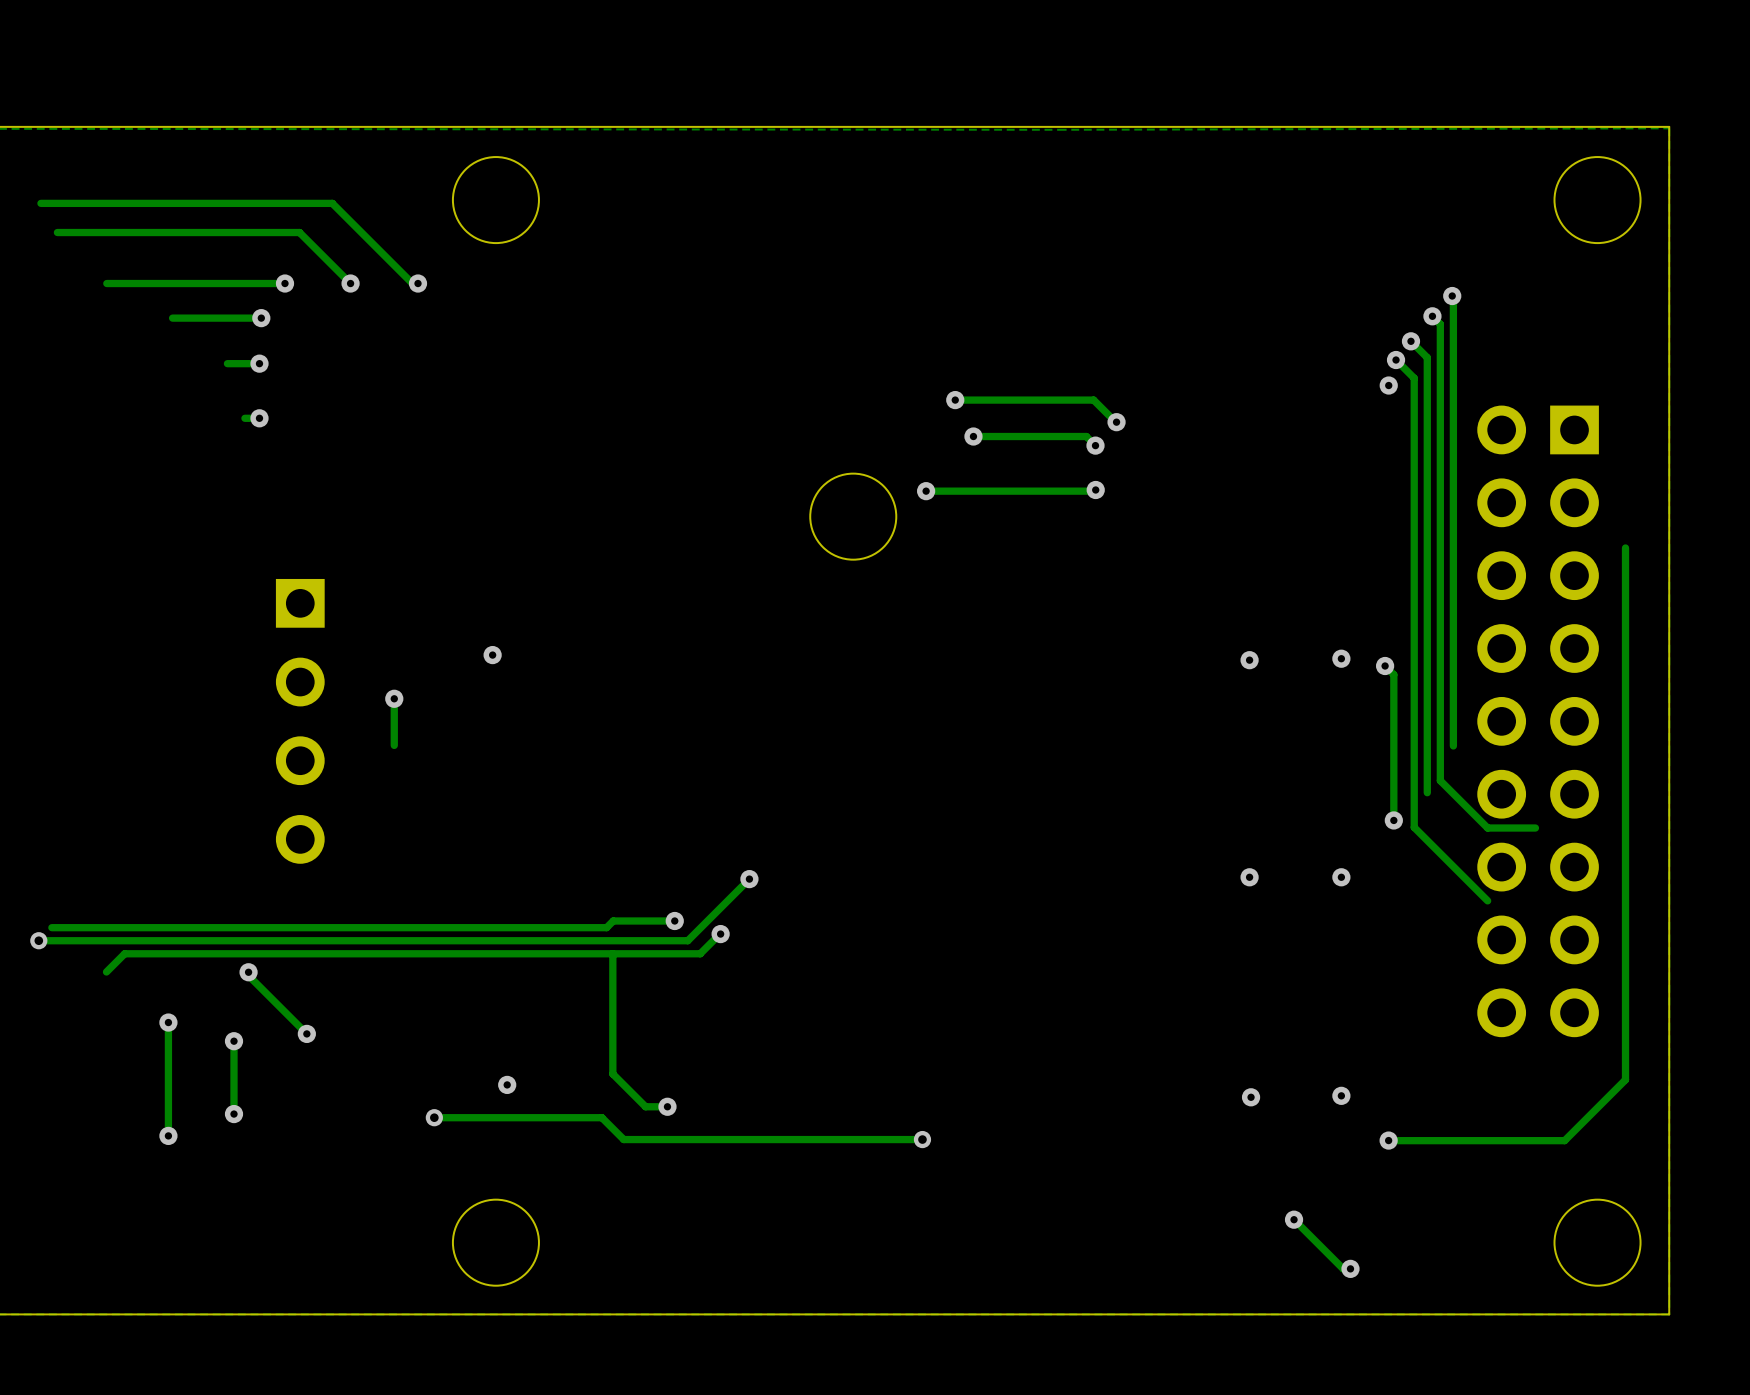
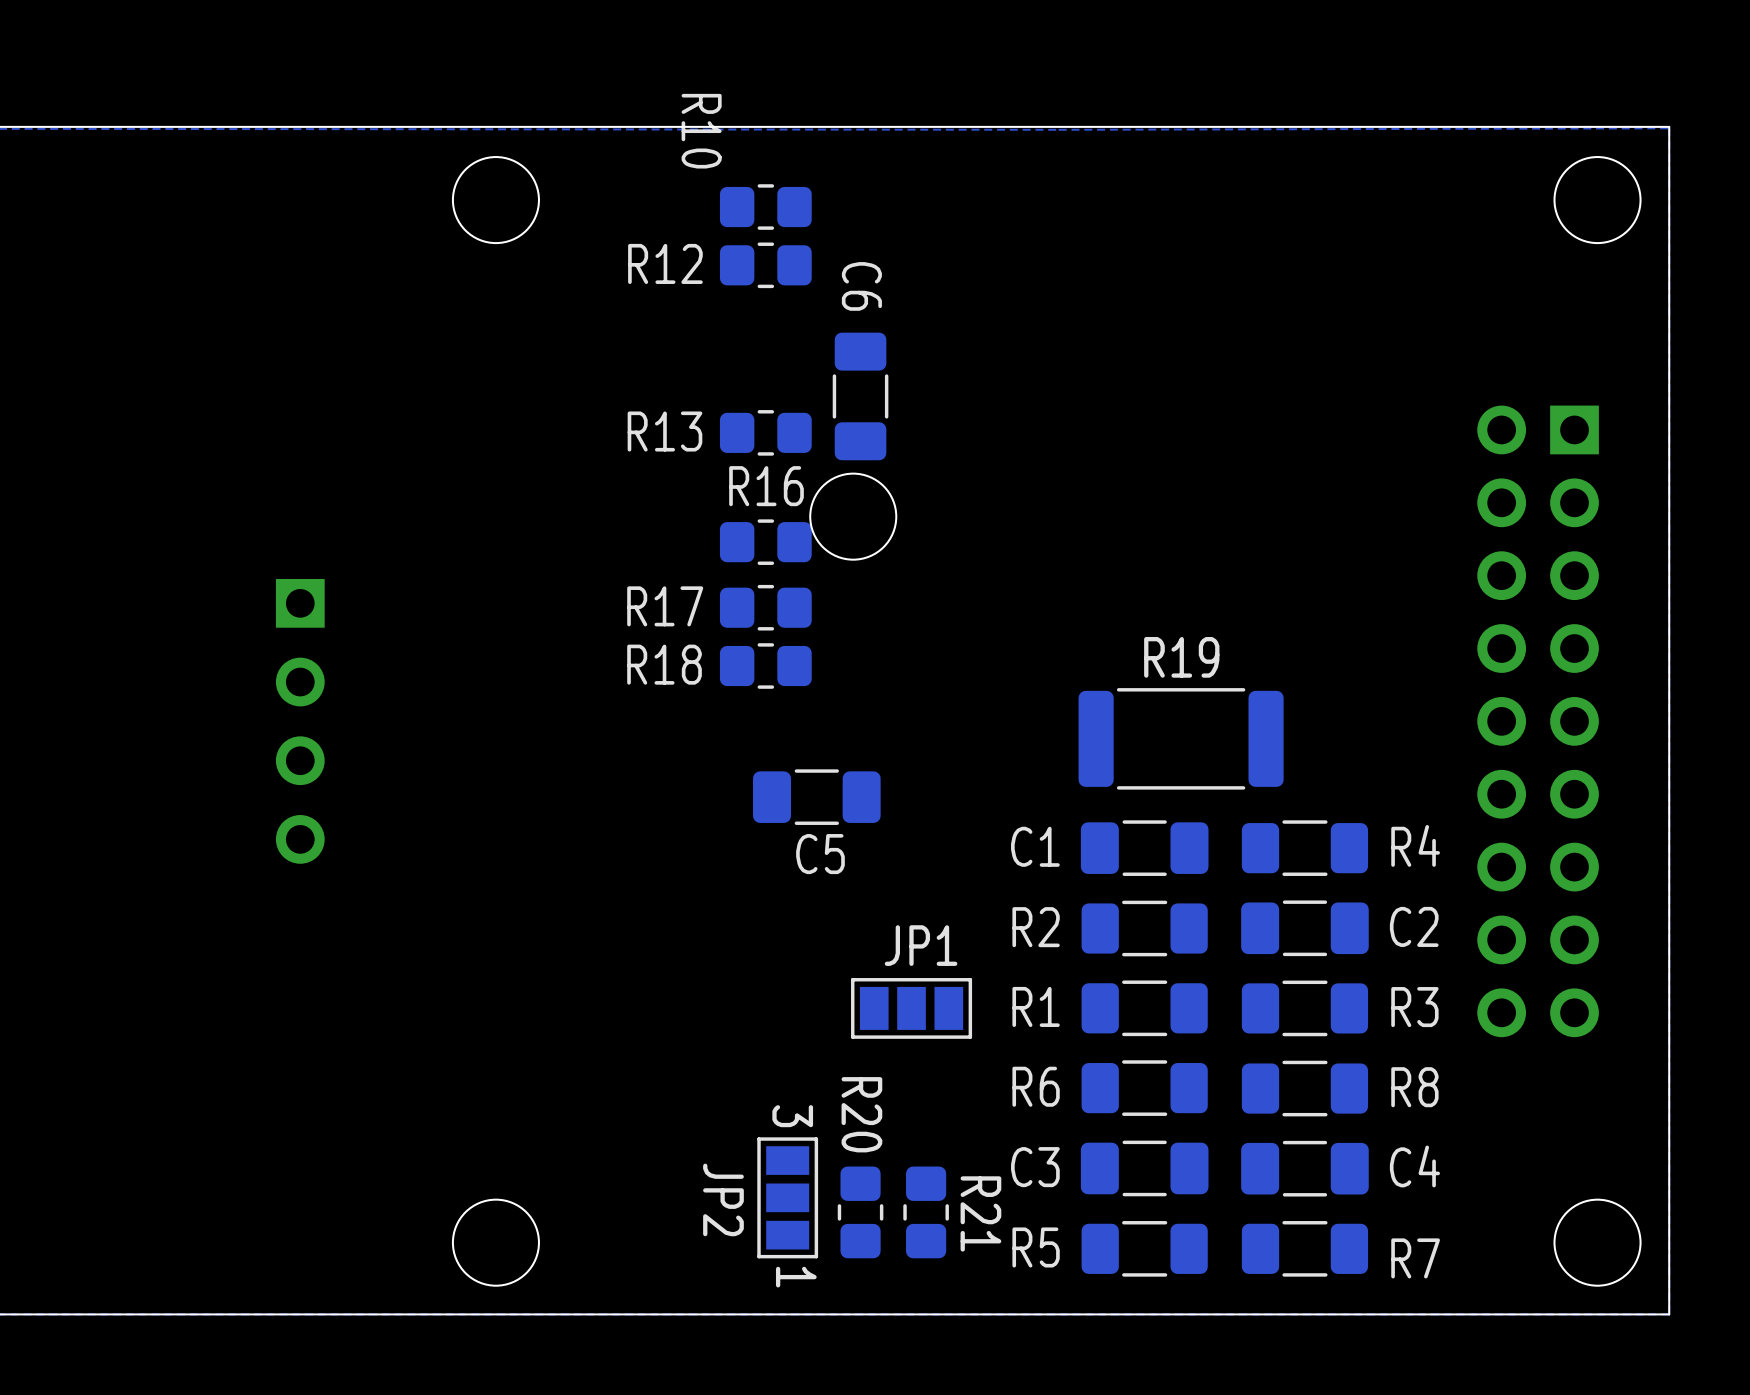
track: (40, 203) (332, 203) (412, 283) (418, 283) -> none
R10: none -> (765, 207)
track: (57, 232) (299, 232) (350, 283) -> none
R12: none -> (765, 265)
track: (284, 283) (106, 283) -> none
via: (284, 283) -> none
via: (350, 283) -> none
via: (418, 283) -> none
track: (1452, 296) (1453, 745) -> none
via: (1452, 296) -> none
track: (1432, 316) (1440, 324) (1440, 780) (1487, 828) (1535, 828) -> none
via: (1432, 316) -> none
track: (261, 318) (172, 318) -> none
via: (261, 318) -> none
track: (1410, 341) (1427, 357) (1427, 792) -> none
via: (1410, 341) -> none
track: (1396, 360) (1414, 378) (1414, 827) (1487, 900) -> none
via: (1396, 360) -> none
track: (259, 363) (227, 363) -> none
via: (259, 363) -> none
via: (1388, 385) -> none
C6: none -> (860, 396)
track: (955, 400) (1093, 400) (1116, 422) -> none
via: (955, 400) -> none
track: (259, 418) (244, 418) -> none
via: (259, 418) -> none
via: (1116, 422) -> none
R13: none -> (765, 432)
track: (973, 436) (1086, 436) (1095, 445) -> none
via: (973, 436) -> none
via: (1095, 445) -> none
track: (1095, 490) (926, 491) -> none
via: (1095, 490) -> none
via: (926, 491) -> none
R16: none -> (765, 542)
track: (1625, 547) (1625, 1079) (1564, 1140) (1388, 1140) -> none
R17: none -> (765, 607)
via: (492, 655) -> none
via: (1341, 658) -> none
via: (1249, 660) -> none
R18: none -> (765, 666)
track: (1385, 666) (1393, 674) (1393, 820) -> none
via: (1385, 666) -> none
track: (394, 698) (394, 745) -> none
via: (394, 698) -> none
R19: none -> (1181, 738)
C5: none -> (816, 797)
via: (1393, 820) -> none
C1: none -> (1144, 848)
R4: none -> (1304, 848)
via: (1249, 877) -> none
via: (1341, 877) -> none
track: (749, 879) (687, 940) (38, 940) -> none
via: (749, 879) -> none
track: (674, 920) (613, 920) (606, 927) (51, 927) -> none
via: (674, 920) -> none
R2: none -> (1144, 928)
C2: none -> (1304, 928)
track: (720, 934) (700, 953) (124, 953) (106, 971) -> none
via: (720, 934) -> none
via: (38, 940) -> none
track: (612, 953) (612, 1073) (645, 1106) (667, 1106) -> none
track: (248, 972) (248, 975) (306, 1033) -> none
via: (248, 972) -> none
JP1: none -> (911, 1008)
R1: none -> (1144, 1008)
R3: none -> (1304, 1008)
track: (168, 1022) (168, 1135) -> none
via: (168, 1022) -> none
via: (306, 1033) -> none
track: (234, 1041) (234, 1114) -> none
via: (234, 1041) -> none
via: (507, 1084) -> none
R6: none -> (1144, 1088)
R8: none -> (1304, 1088)
via: (1341, 1095) -> none
via: (1251, 1097) -> none
via: (667, 1106) -> none
via: (234, 1114) -> none
track: (434, 1117) (601, 1117) (623, 1139) (922, 1139) -> none
via: (434, 1117) -> none
via: (168, 1135) -> none
via: (922, 1139) -> none
via: (1388, 1140) -> none
C3: none -> (1144, 1168)
C4: none -> (1304, 1168)
JP2: none -> (787, 1197)
R20: none -> (860, 1212)
R21: none -> (926, 1212)
track: (1294, 1219) (1343, 1268) (1350, 1268) -> none
via: (1294, 1219) -> none
R5: none -> (1144, 1248)
R7: none -> (1304, 1248)
via: (1350, 1268) -> none

